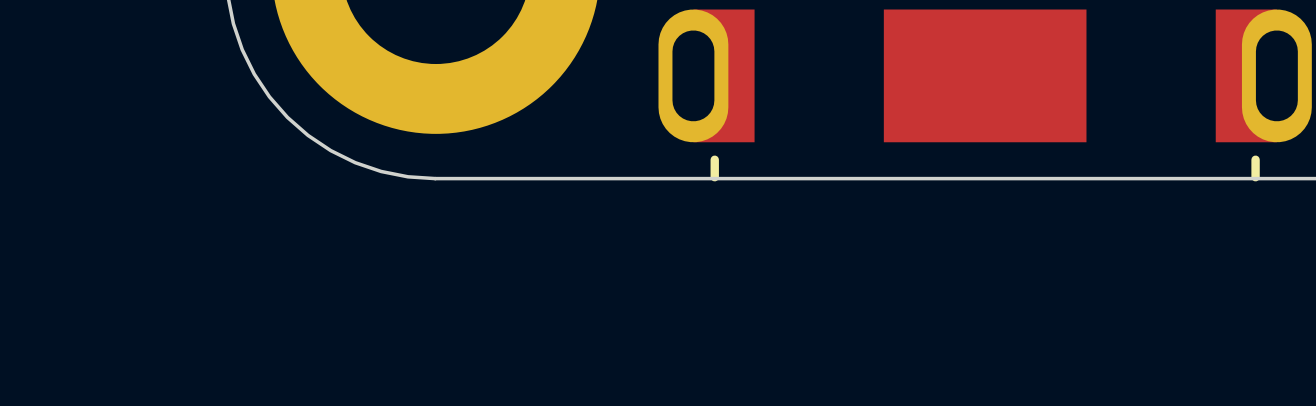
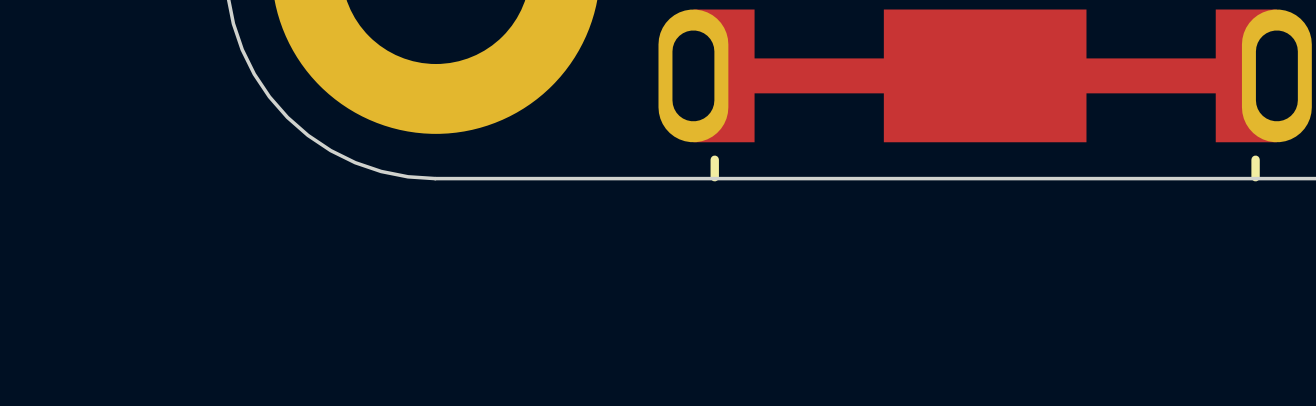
track: none -> (693, 75) (1276, 75)

